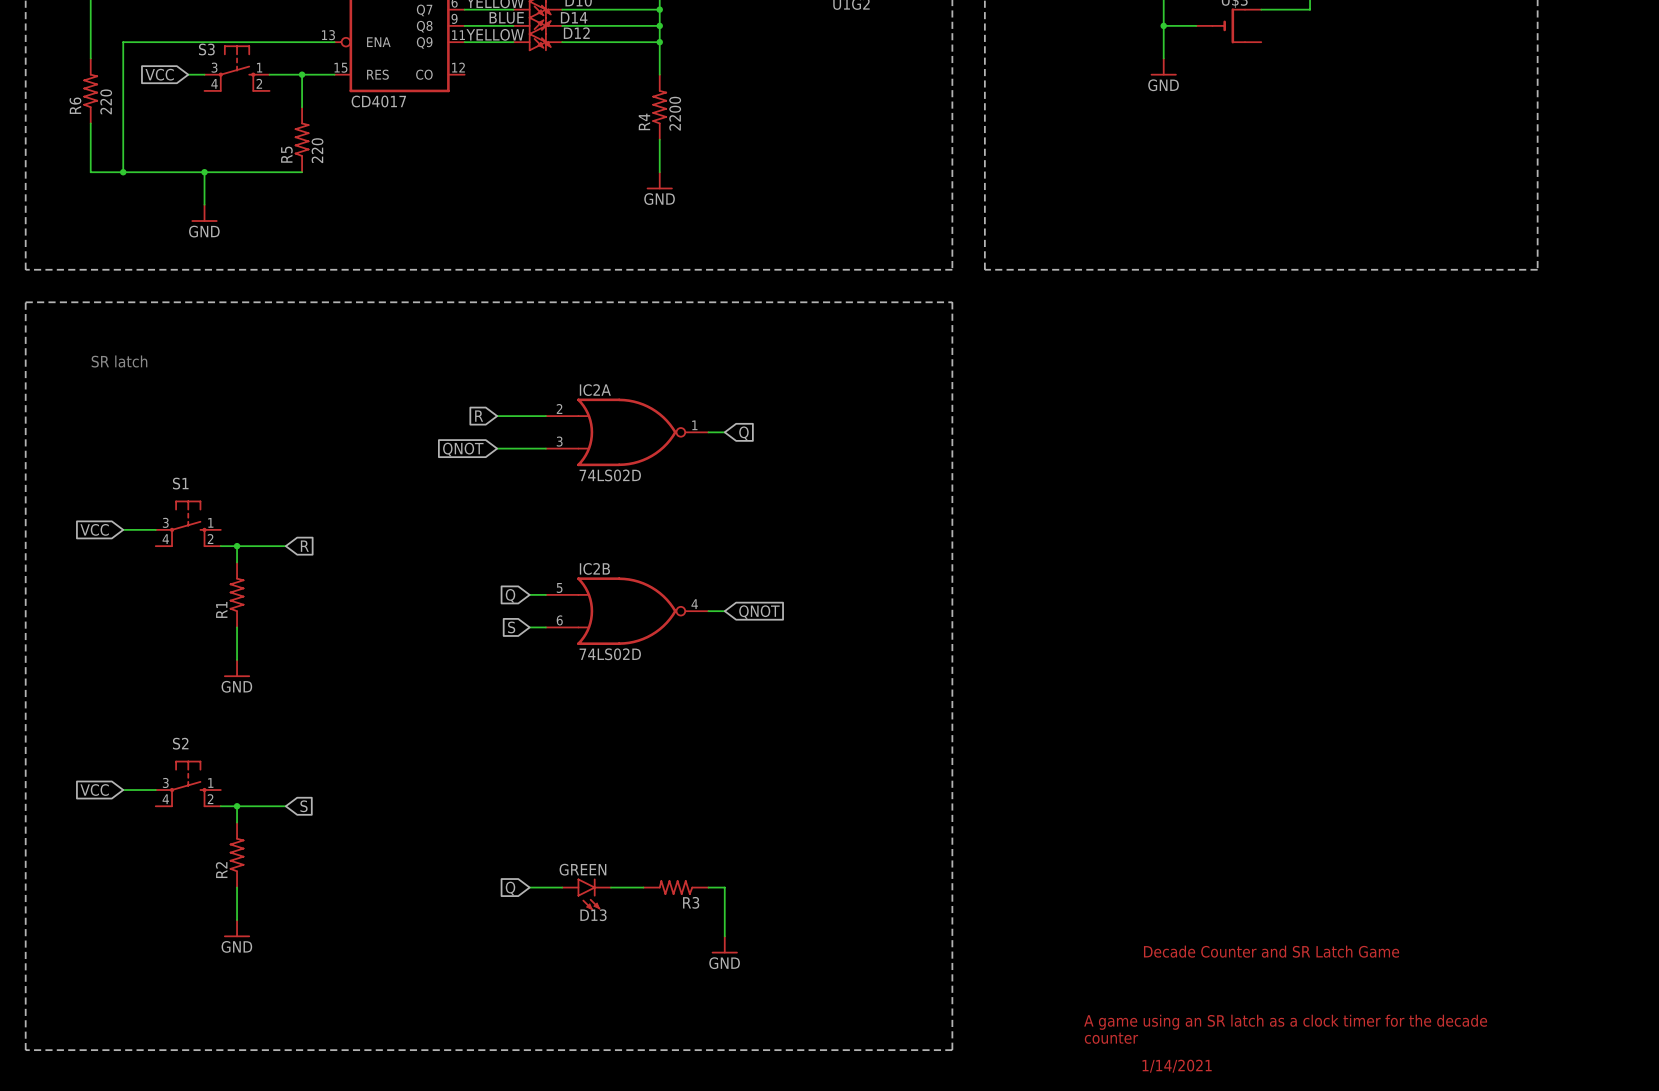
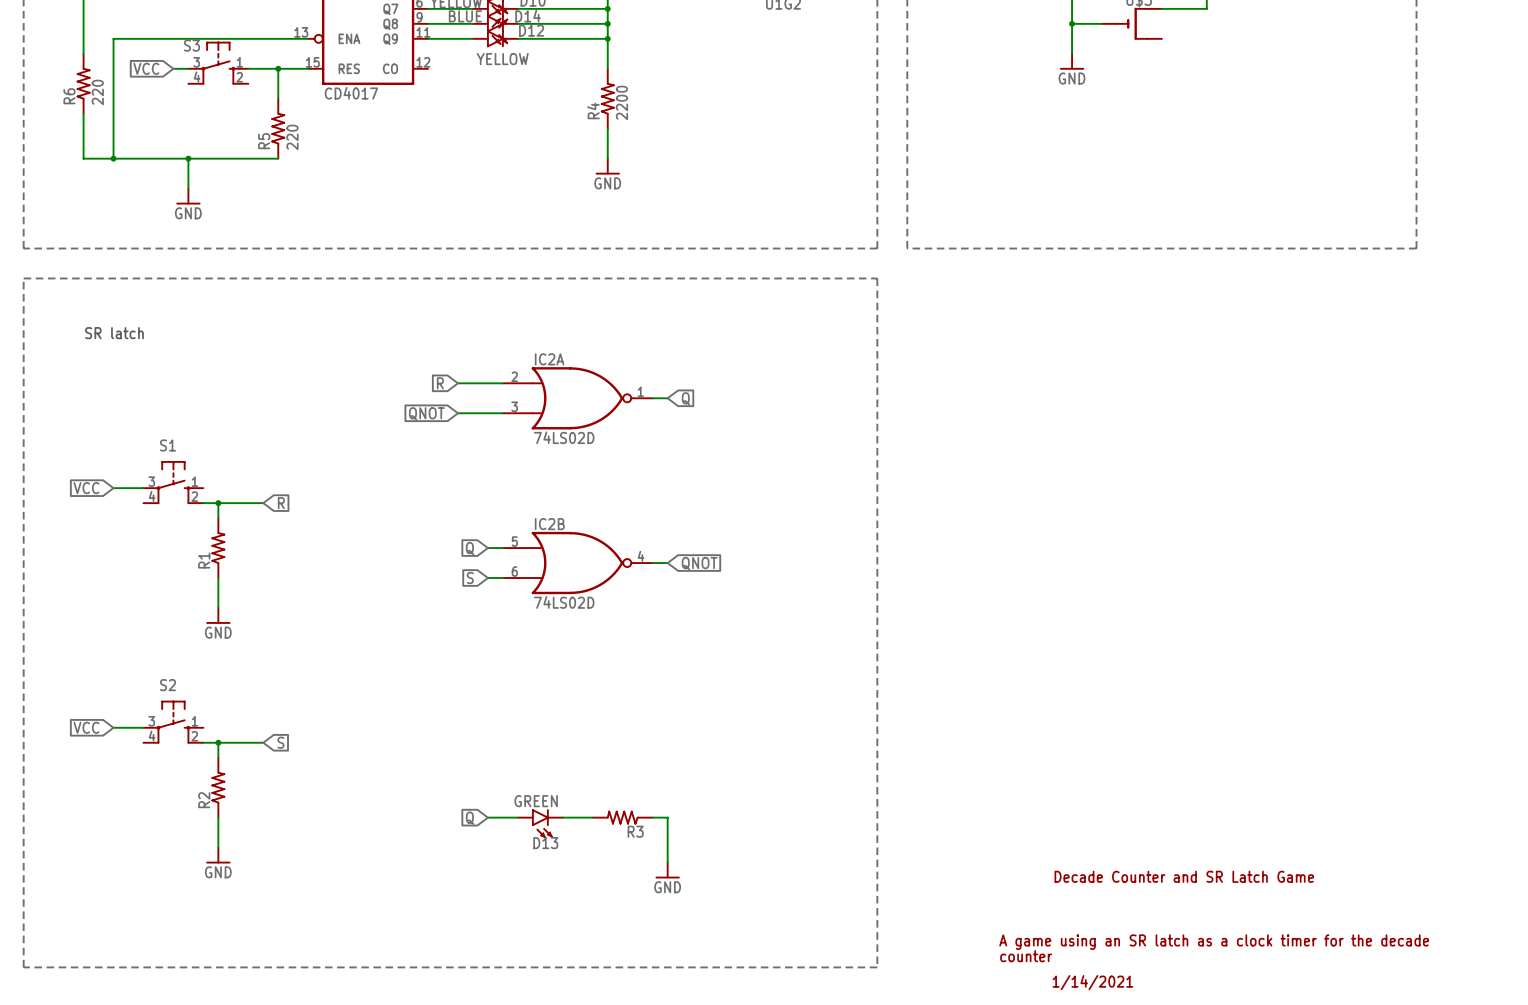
D12 value position: YELLOW (495, 34) -> YELLOW (502, 59)

